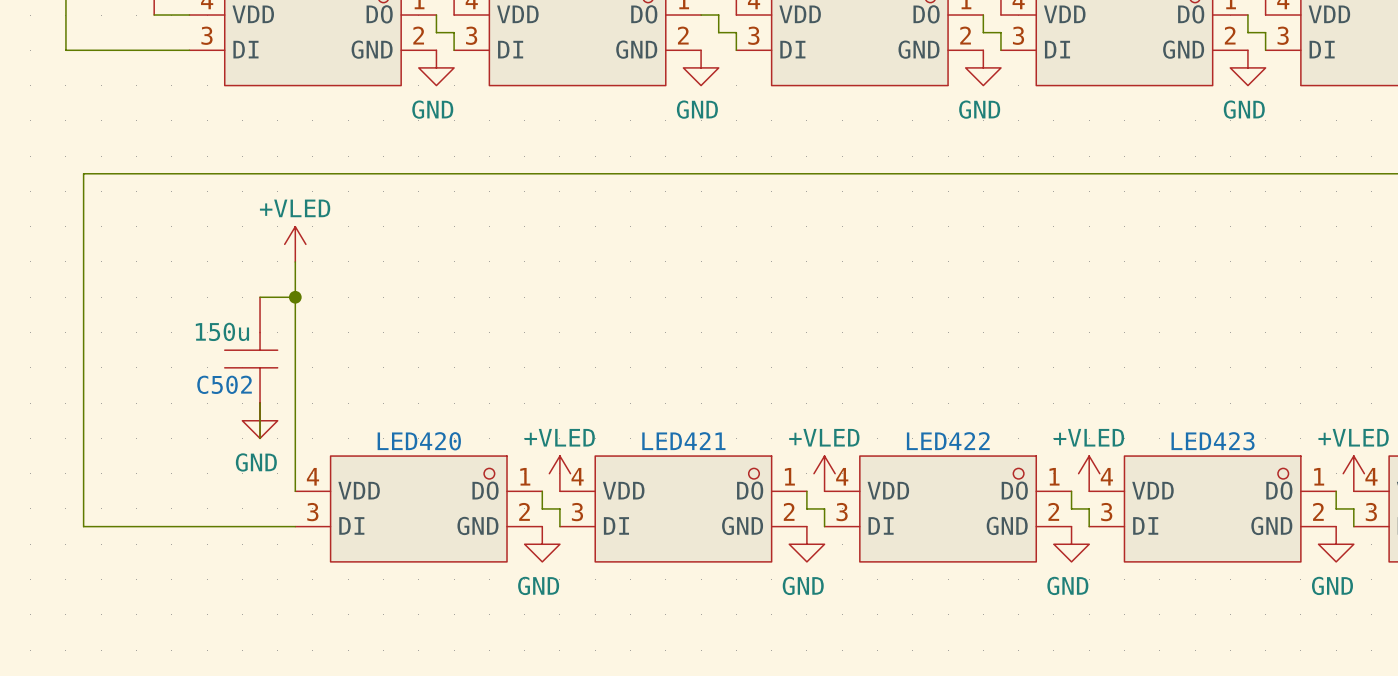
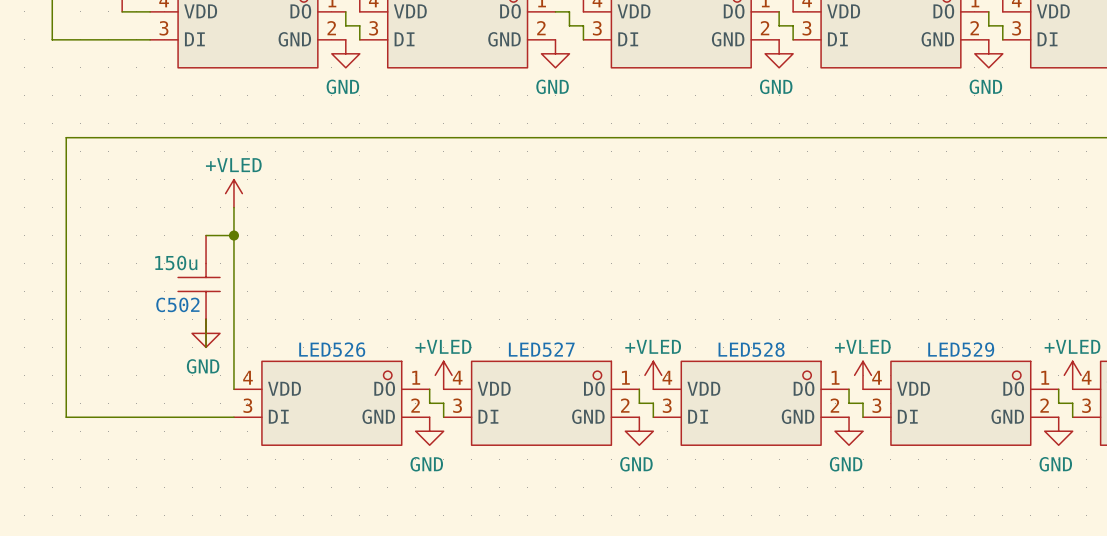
LED420 name: LED420 (419, 441) -> LED526 (332, 349)
LED421 name: LED421 (683, 441) -> LED527 (541, 349)
LED422 name: LED422 (948, 441) -> LED528 (751, 349)
LED423 name: LED423 (1213, 441) -> LED529 (961, 349)

